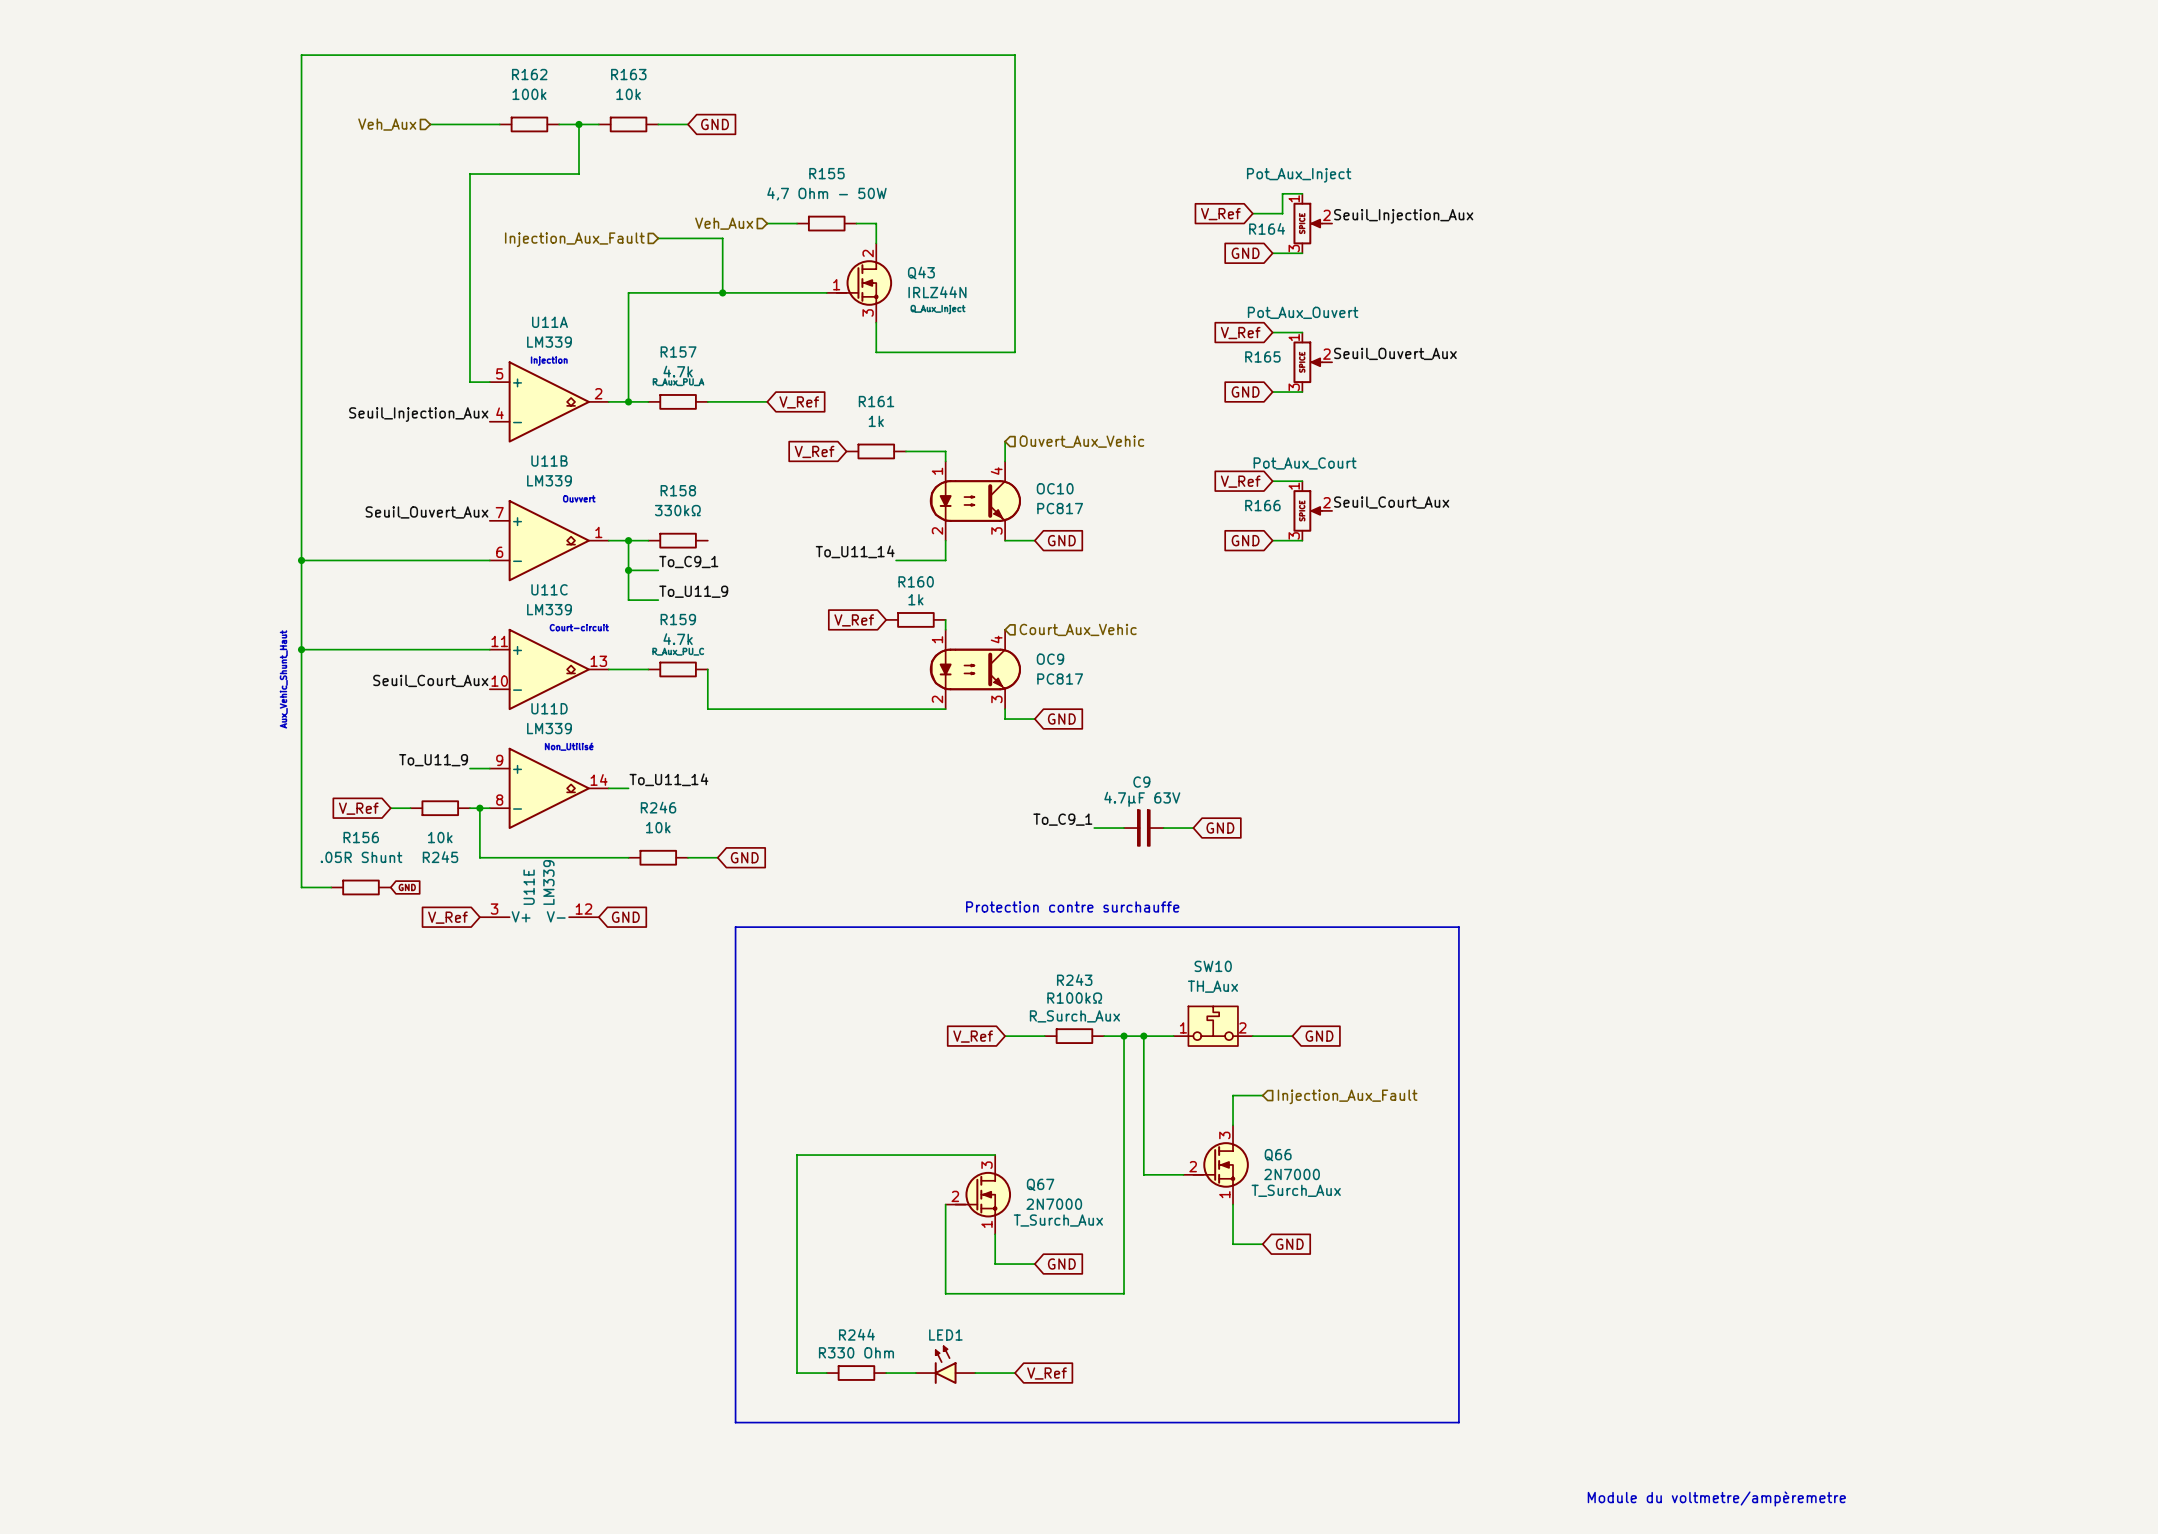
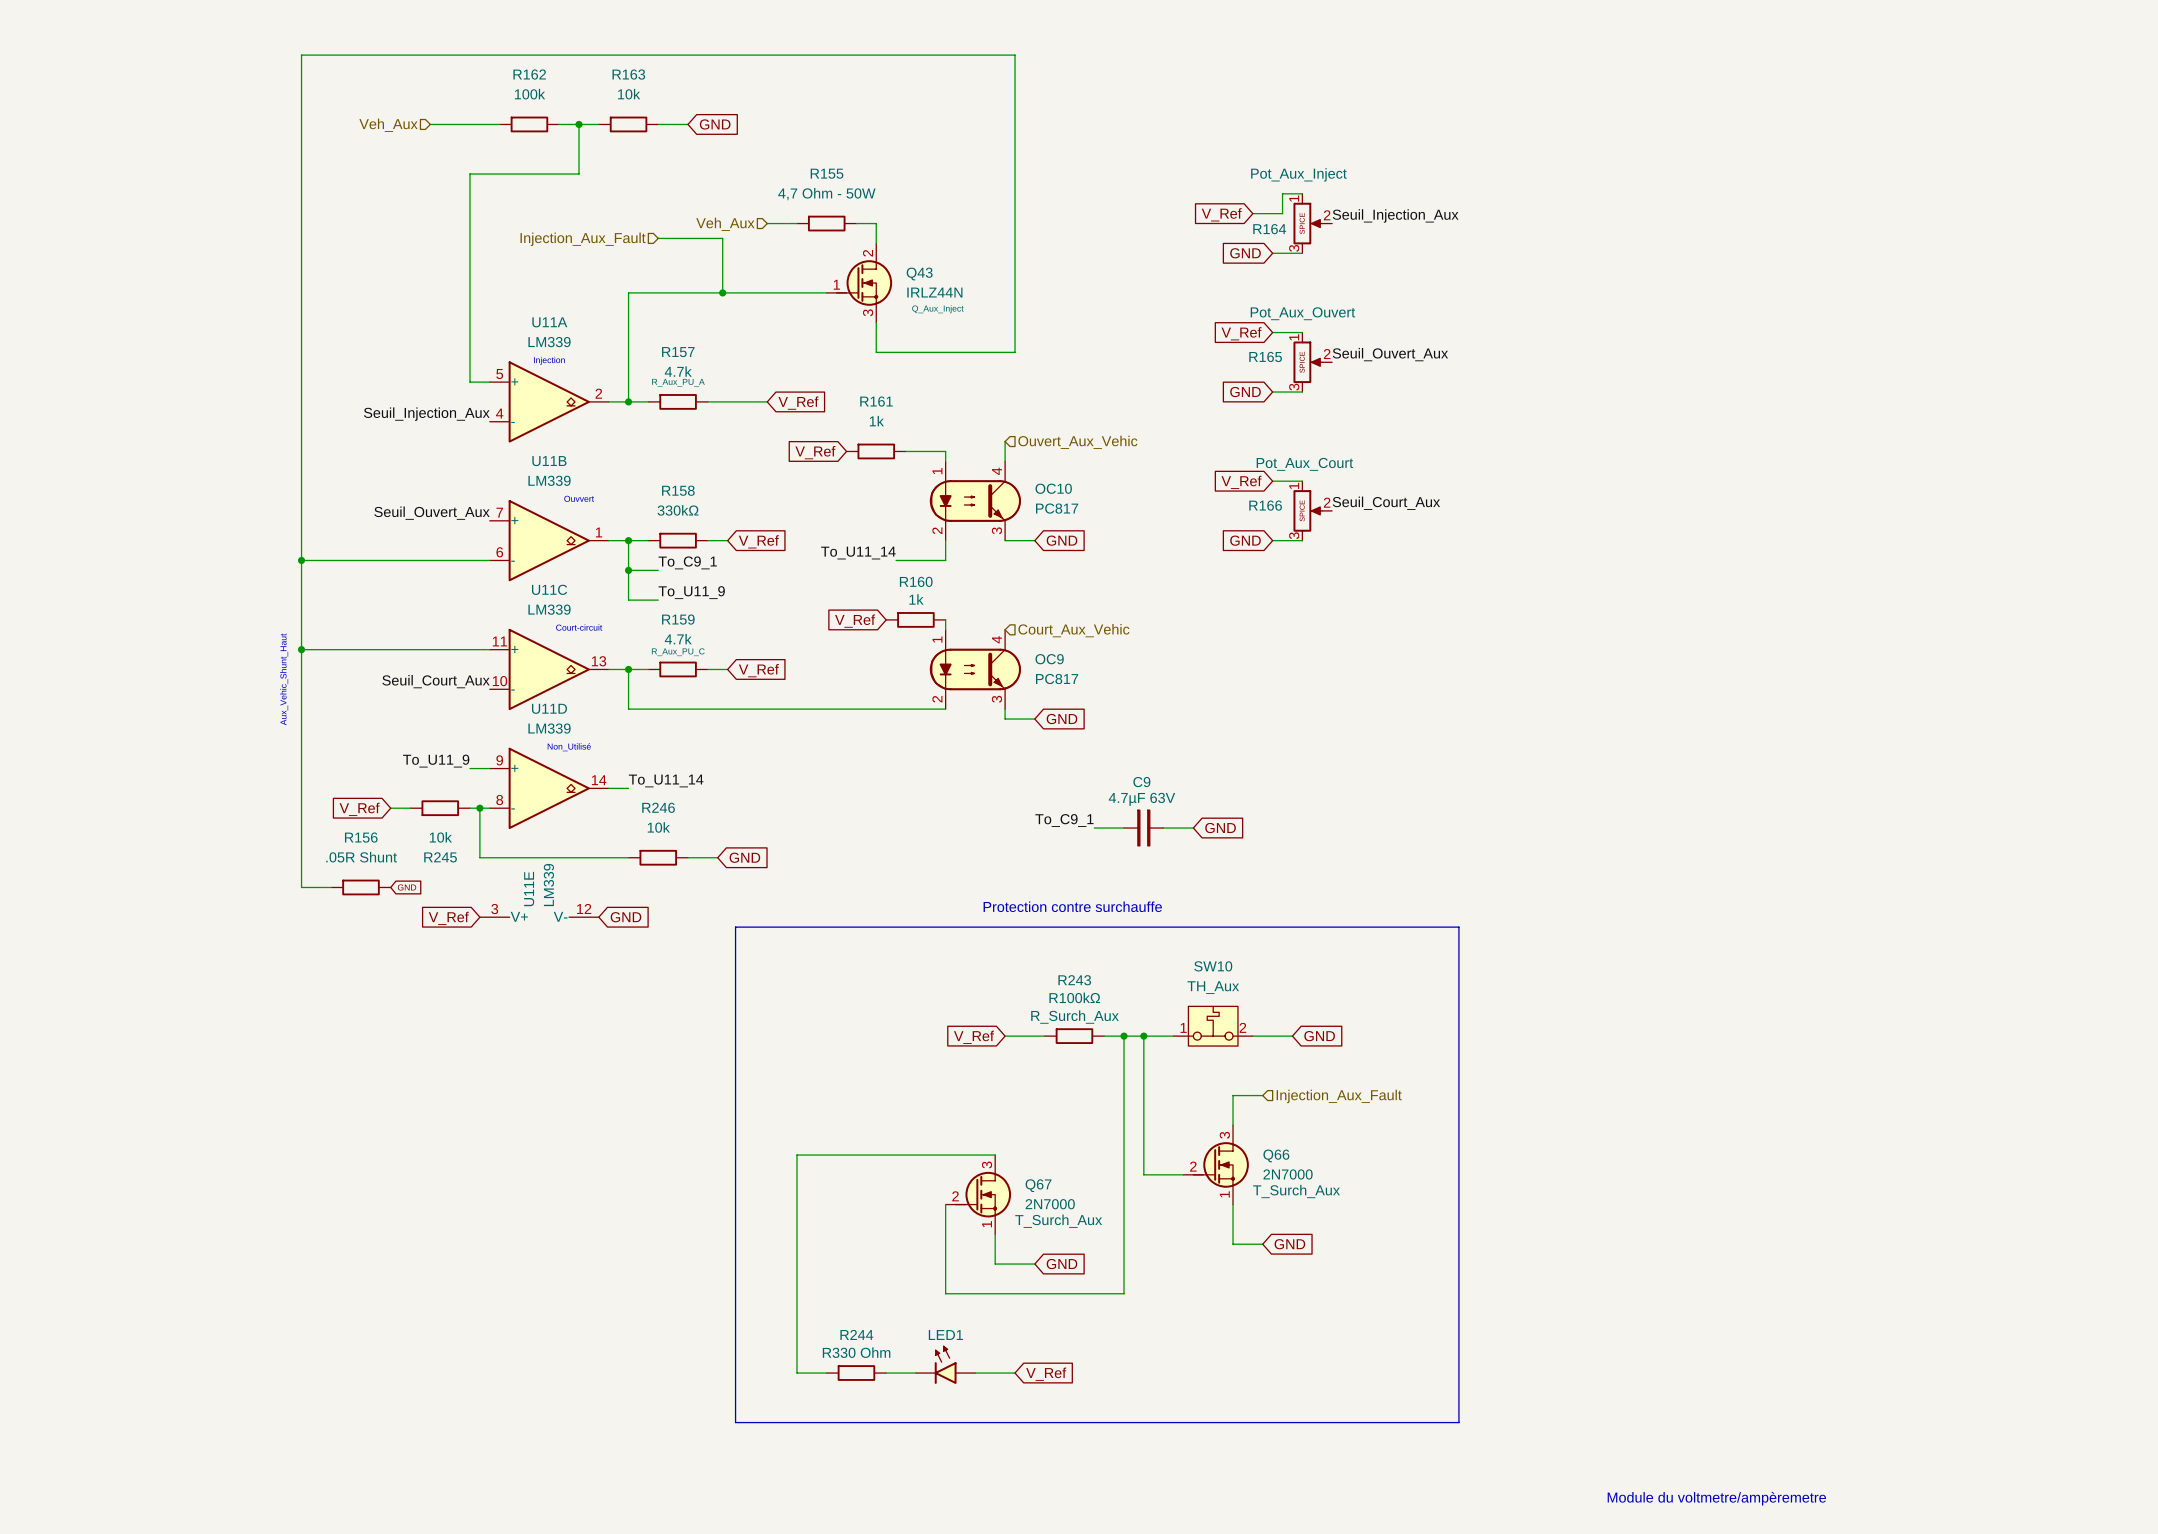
wire: none -> (707, 540) (727, 540)
global label: none -> V_Ref (758, 541)
wire: none -> (628, 669) (628, 709) (707, 709)
junction: none -> (628, 669)
wire: (707, 669) (707, 709) -> (707, 669) (727, 669)
global label: none -> V_Ref (758, 670)

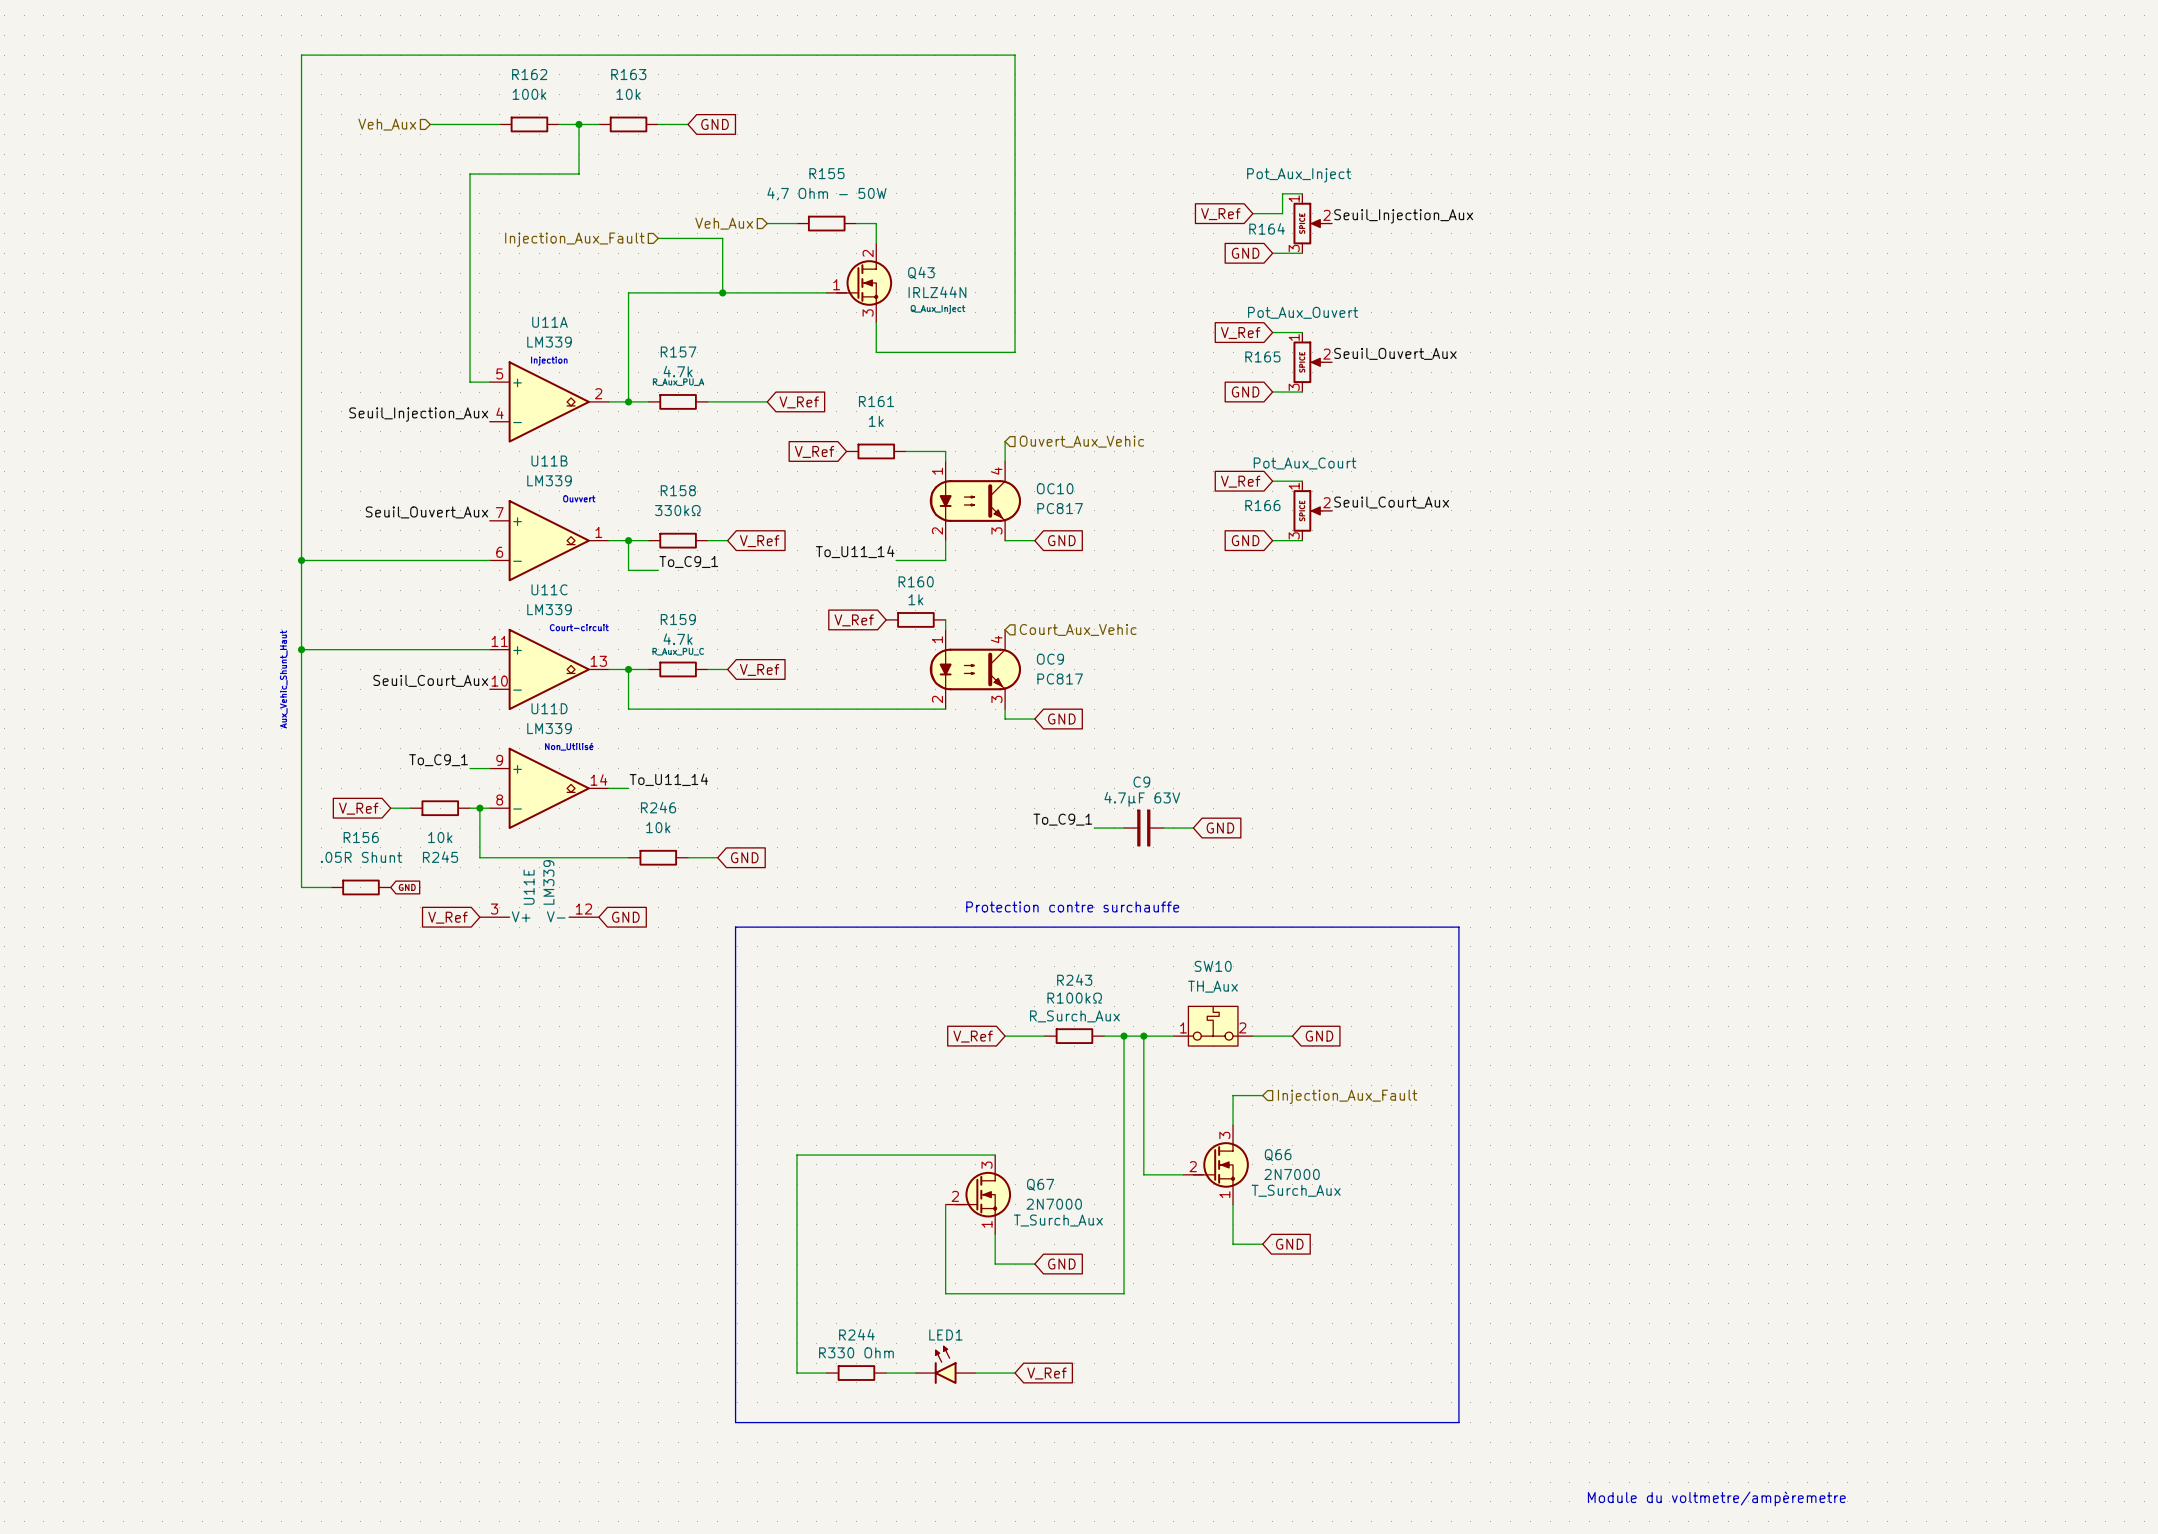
wire: (628, 570) (628, 600) (658, 600) -> none
junction: (628, 570) -> none
label: To_U11_9 (691, 592) -> none
label: To_U11_9 (436, 761) -> To_C9_1 (438, 760)

